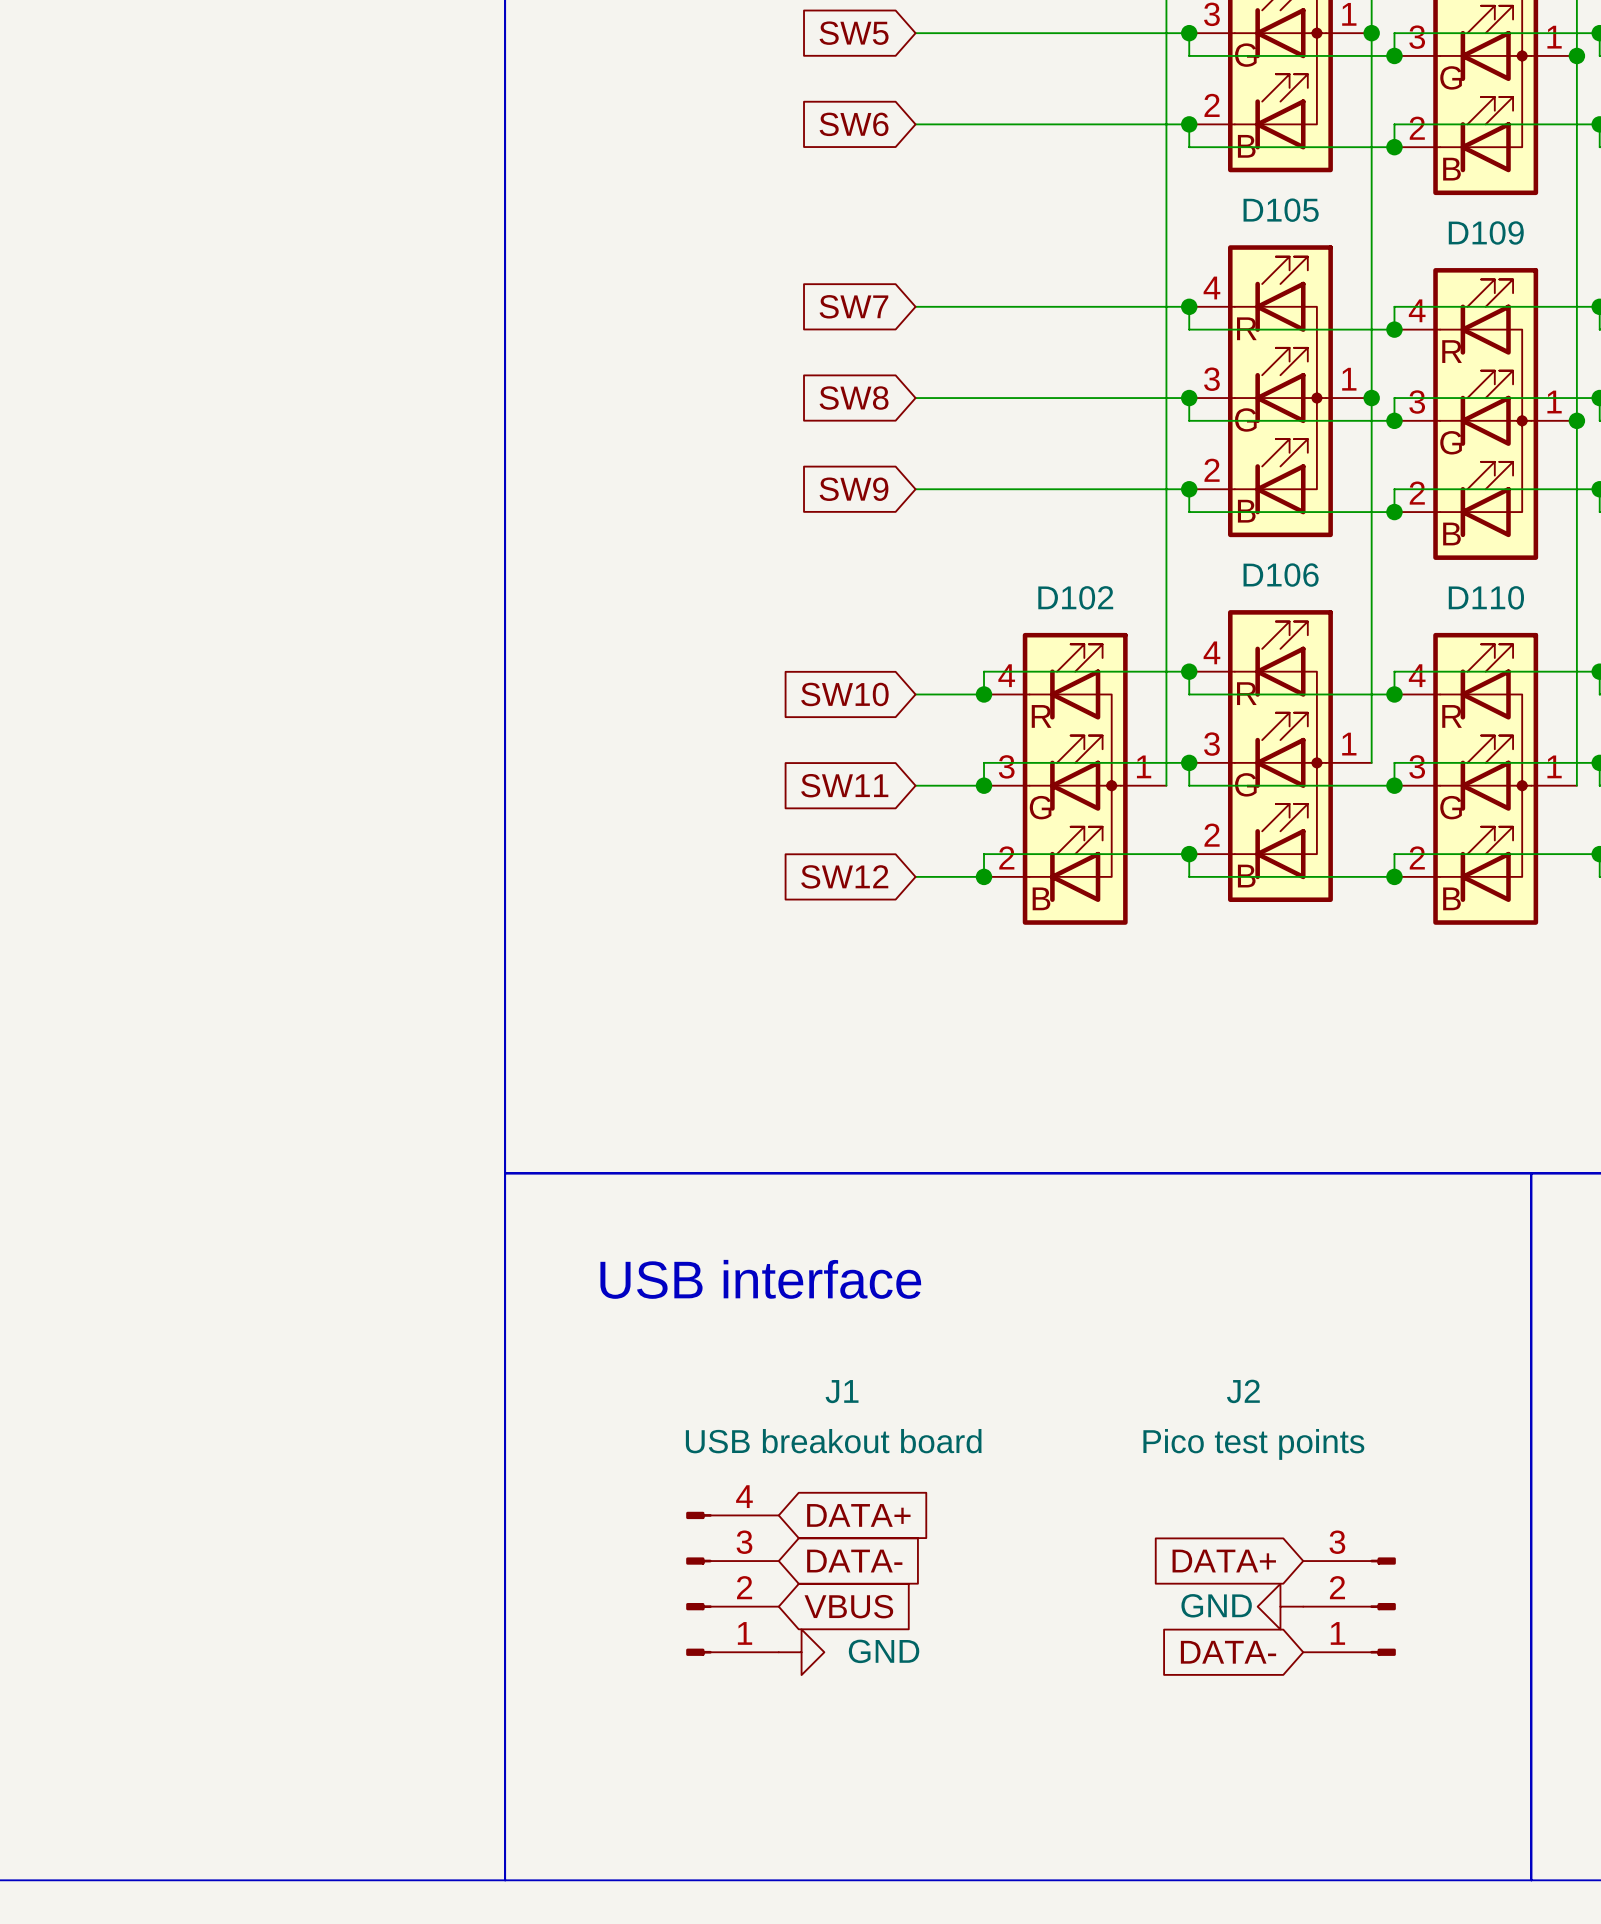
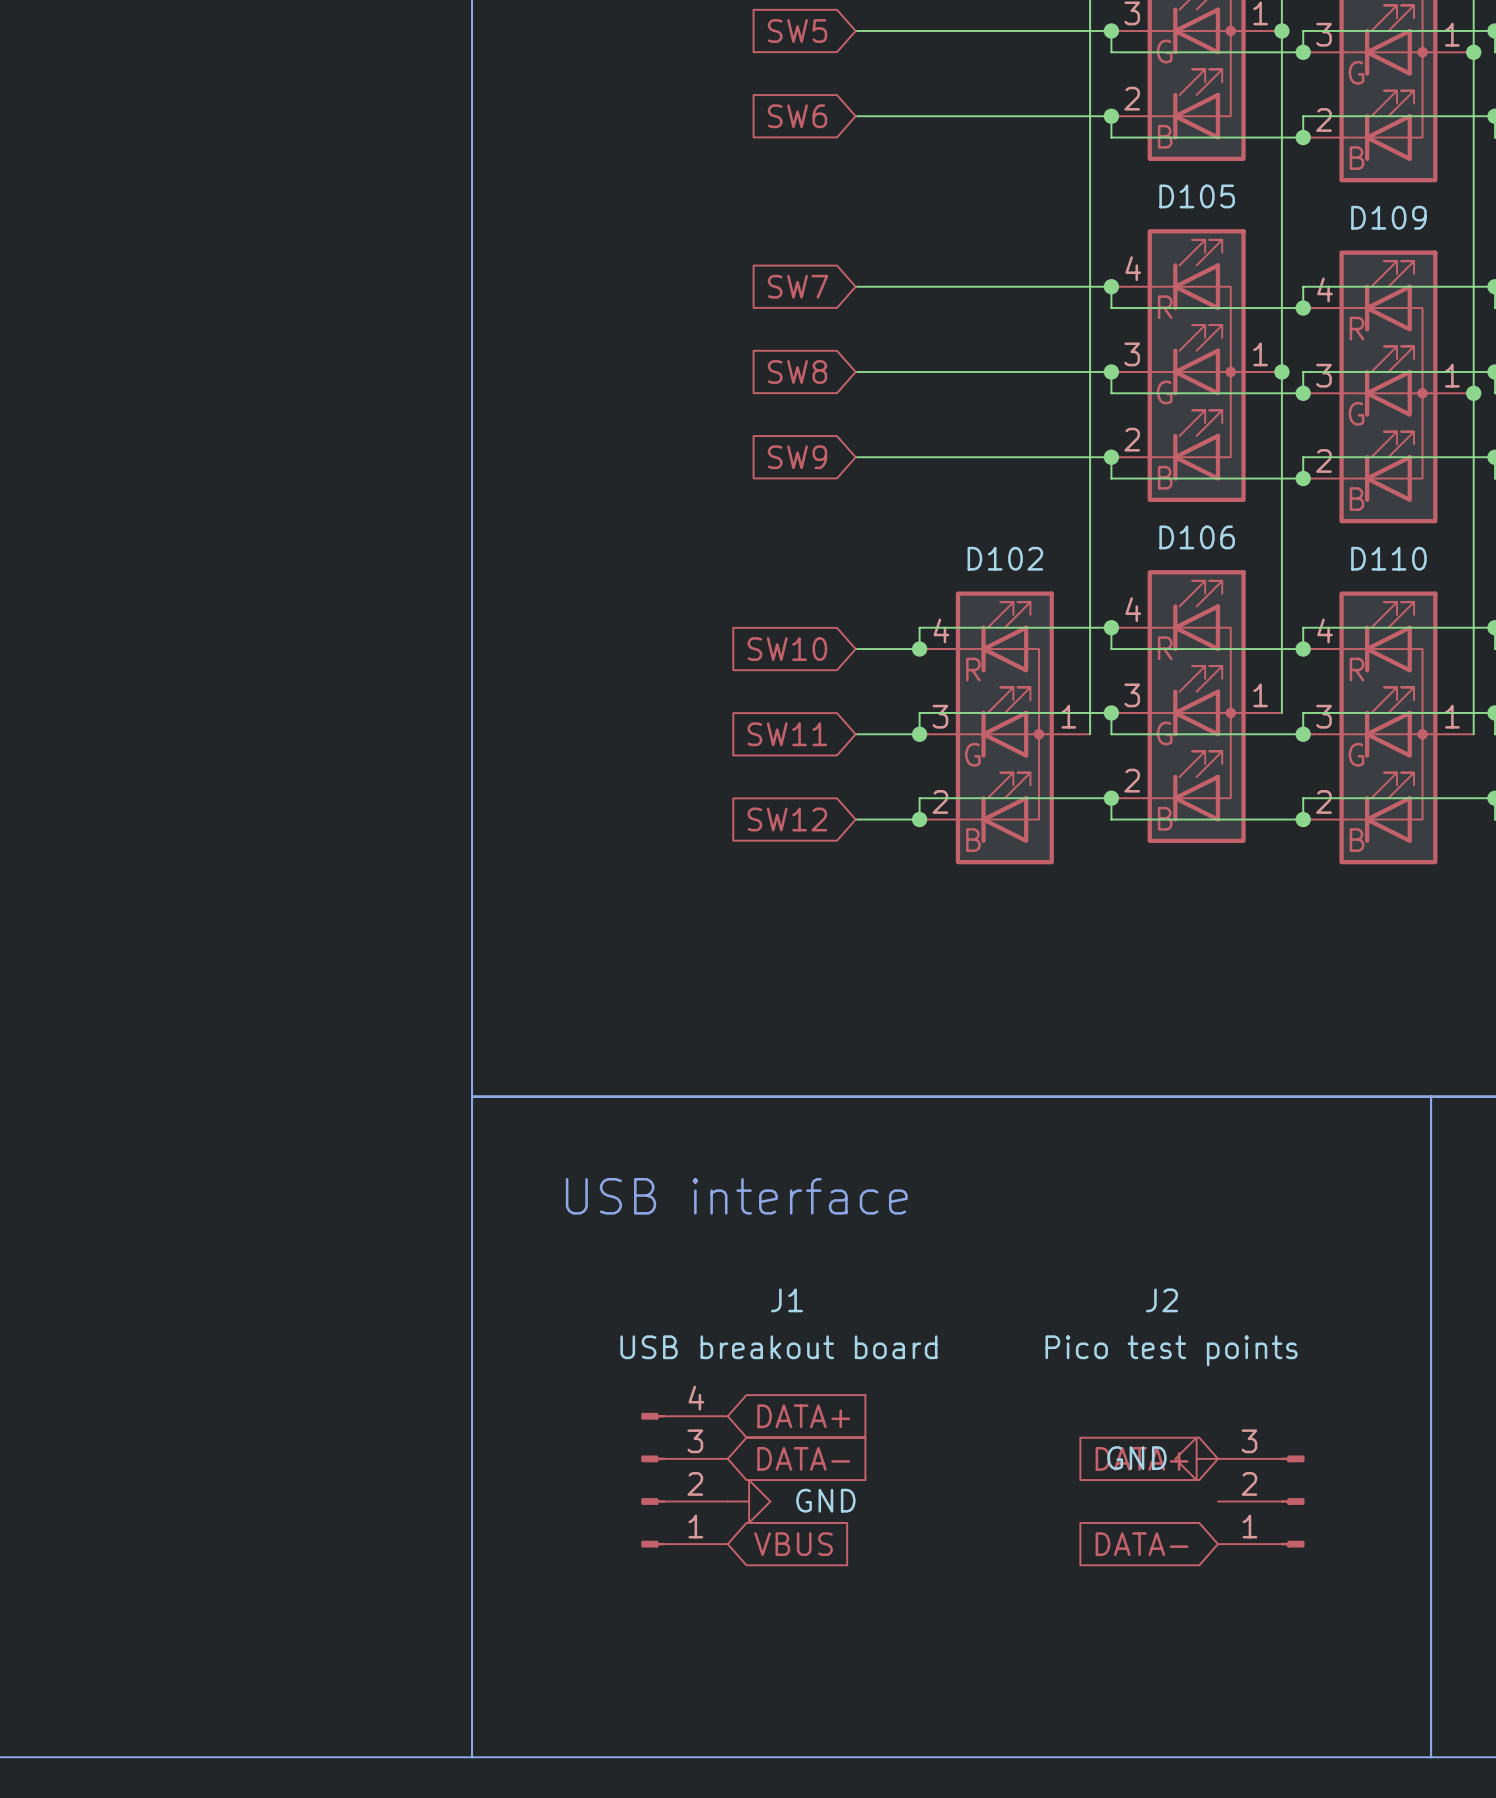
global label position: VBUS (848, 1606) -> VBUS (793, 1544)
power symbol position: GND (1280, 1606) -> GND (1196, 1458)
power symbol position: GND (801, 1652) -> GND (749, 1501)

